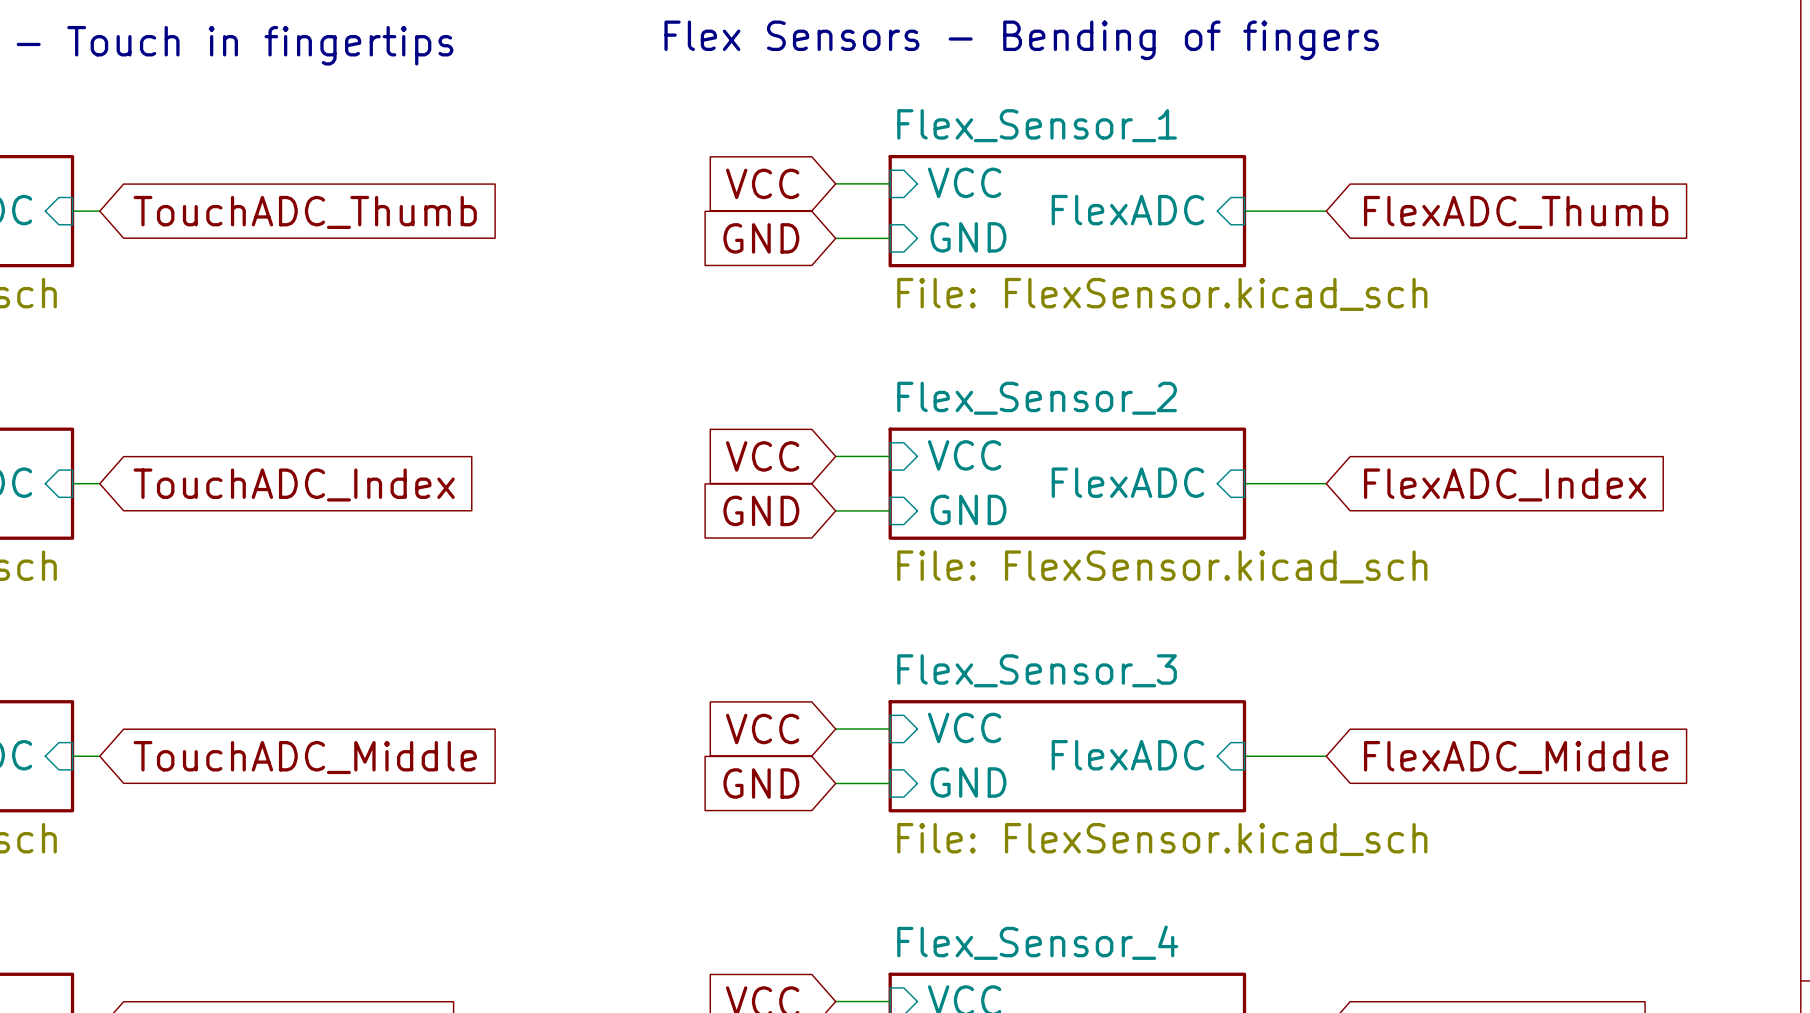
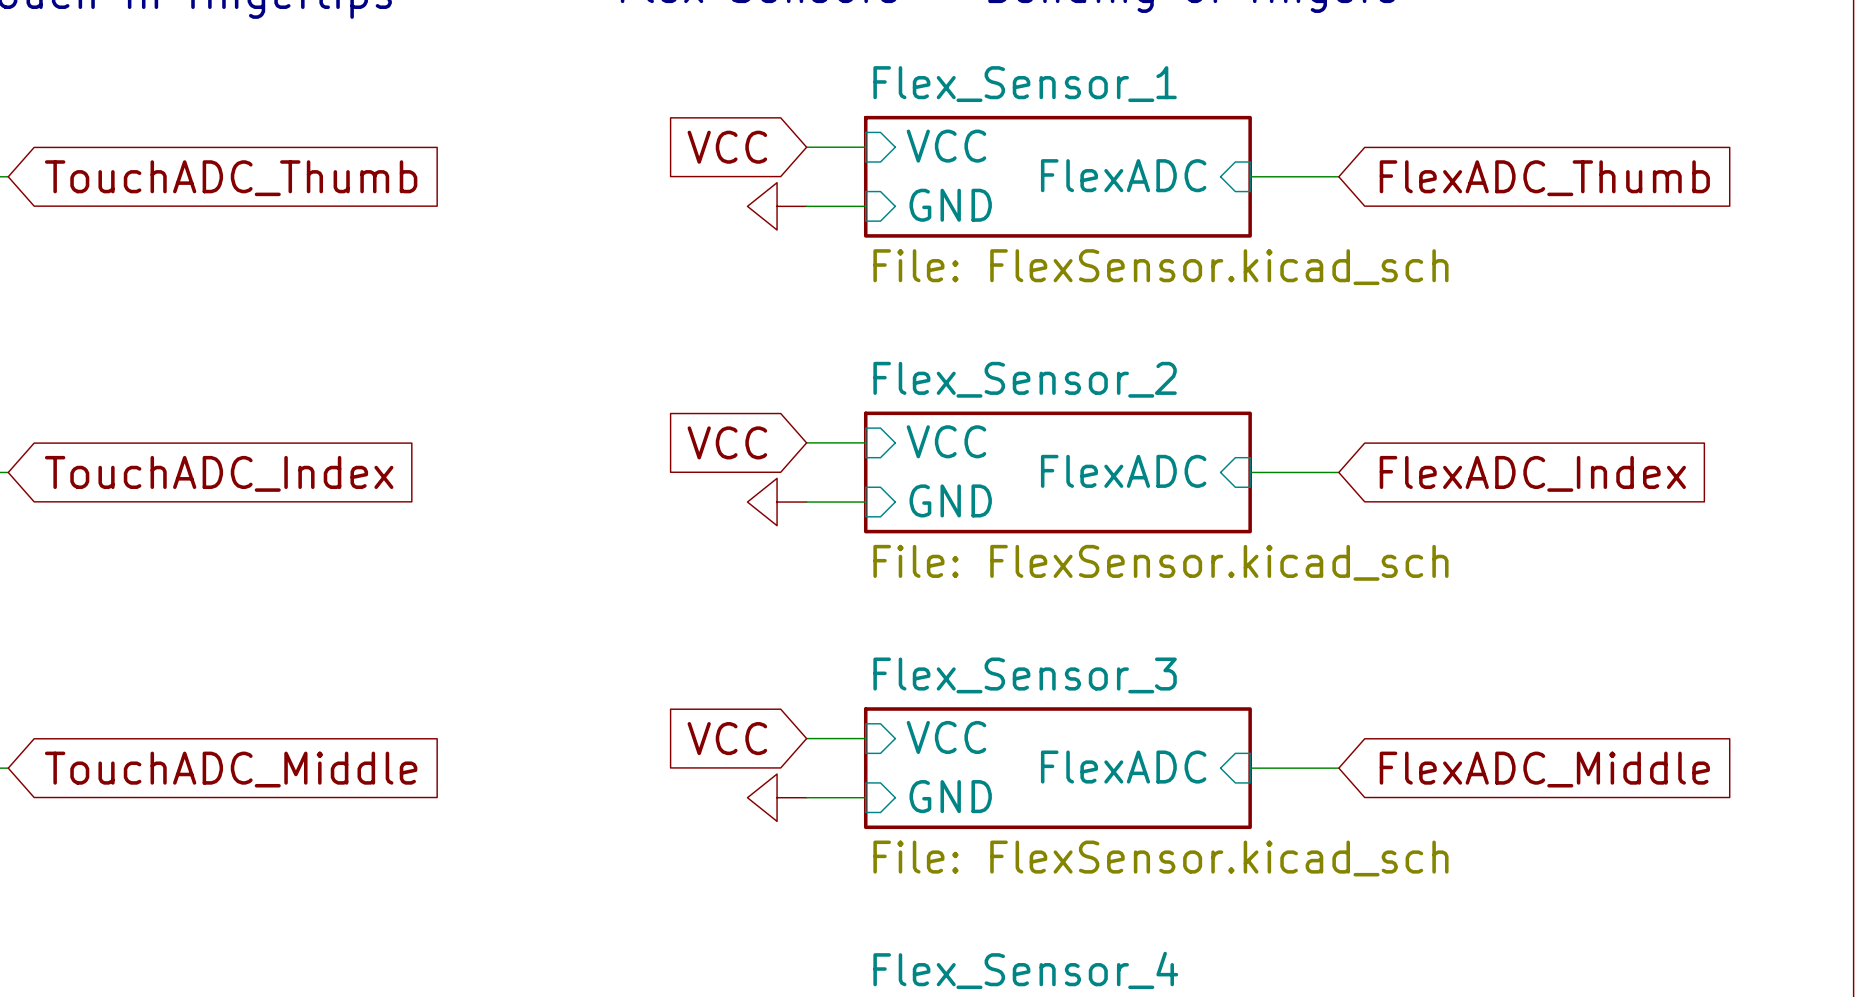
global label: GND (761, 238) -> none
power symbol: none -> (777, 206)
global label: GND (761, 510) -> none
power symbol: none -> (777, 502)
global label: GND (761, 783) -> none
power symbol: none -> (777, 797)

